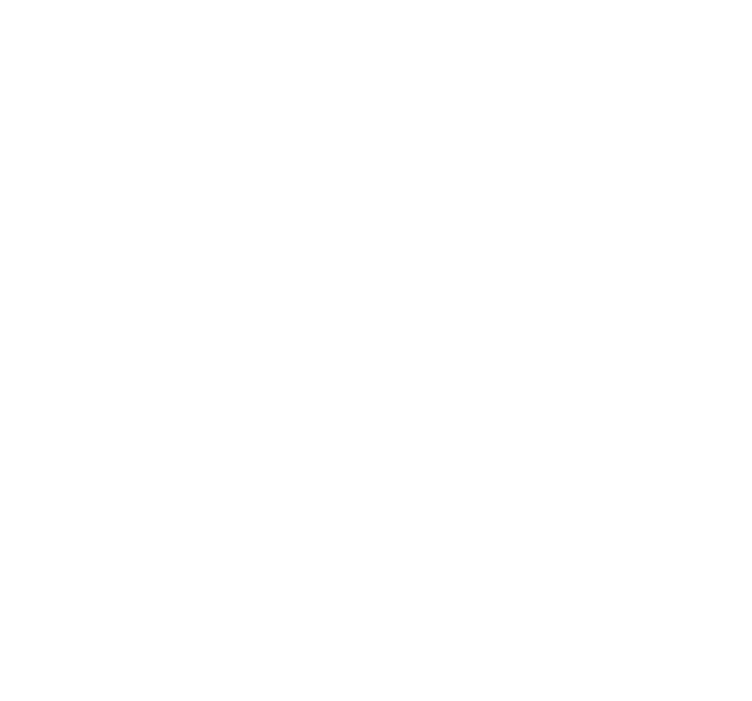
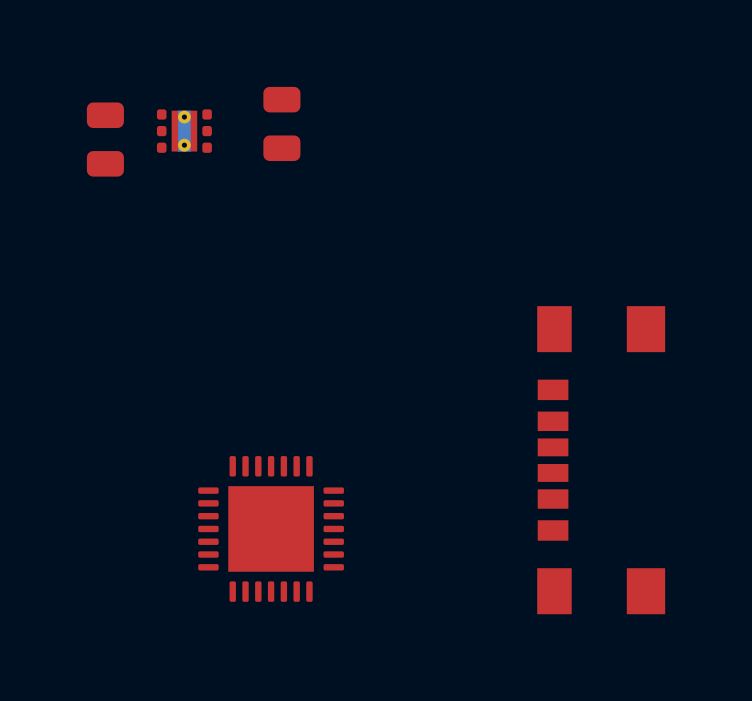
part: none -> (281, 123)
part: none -> (184, 131)
part: none -> (105, 139)
part: none -> (601, 460)
part: none -> (271, 528)

